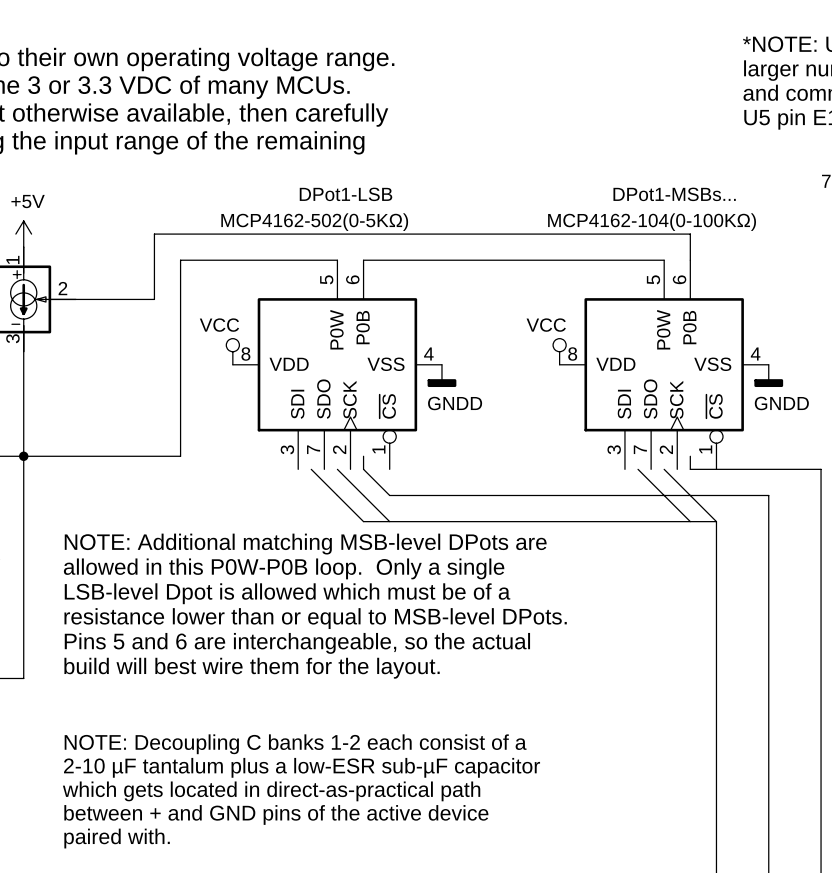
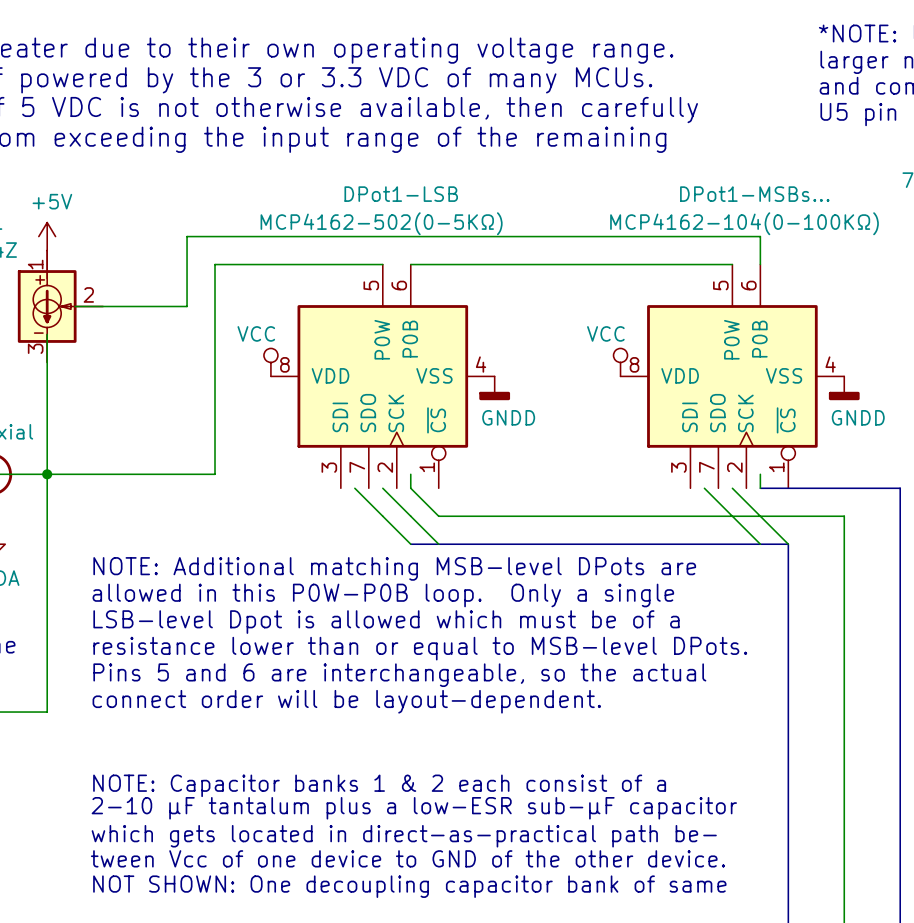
text: build will best wire them for the layout. (252, 668) -> connect order will be layout-dependent. (346, 701)
text: NOTE: Decoupling C banks 1-2 each consist of a (295, 744) -> NOTE: Capacitor banks 1 & 2 each consist of a (379, 785)
text: which gets located in direct-as-practical path (271, 791) -> which gets located in direct-as-practical path be- (404, 836)
text: between + and GND pins of the active device (276, 814) -> tween Vcc of one device to GND of the other device. (407, 858)
text: paired with. (117, 838) -> NOT SHOWN: One decoupling capacitor bank of same (409, 886)

